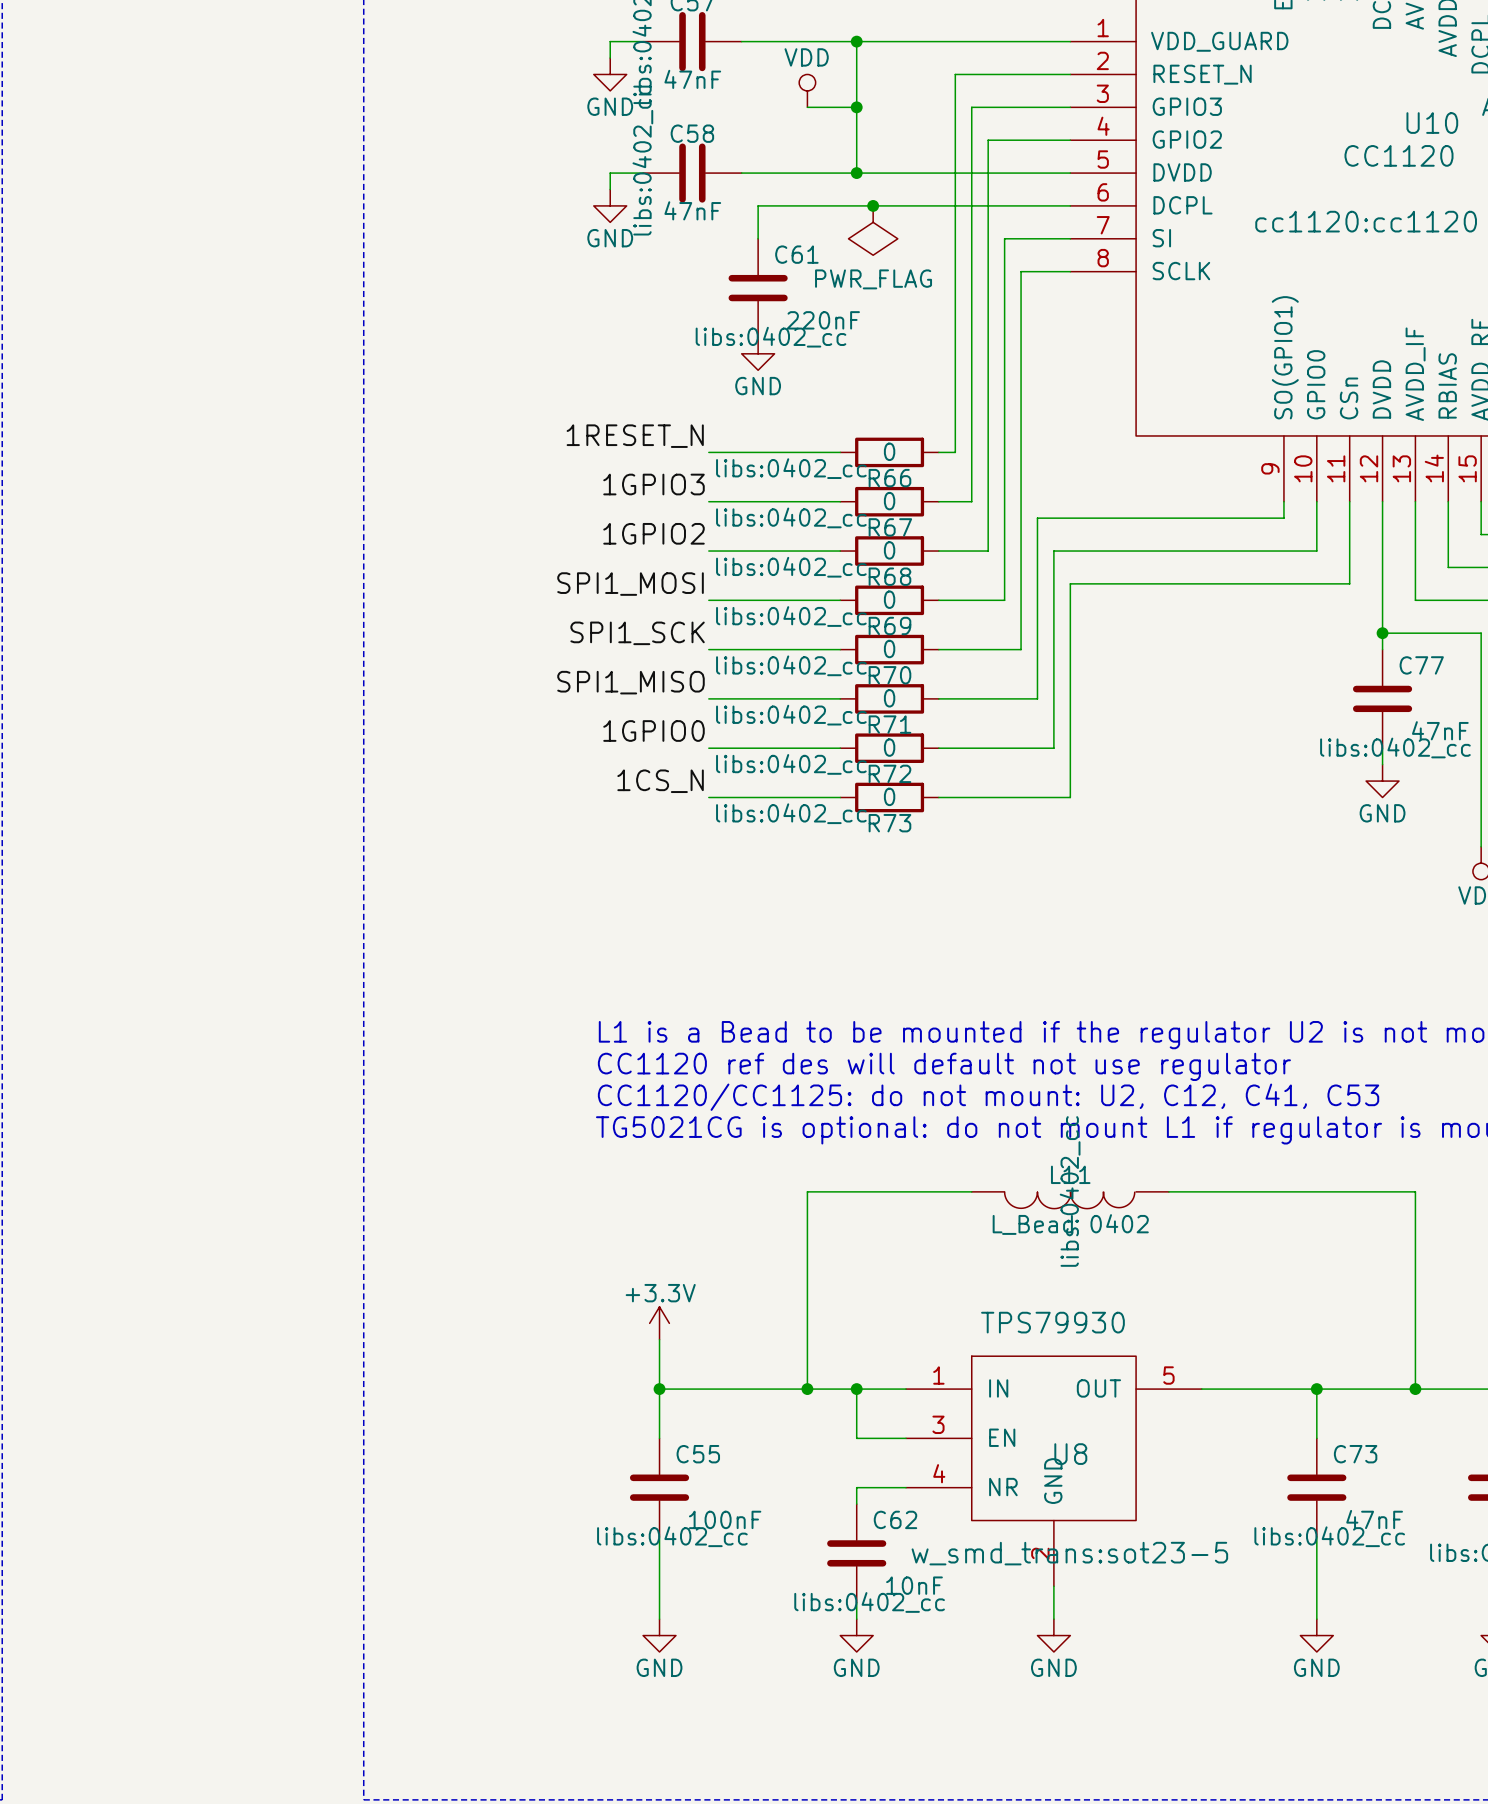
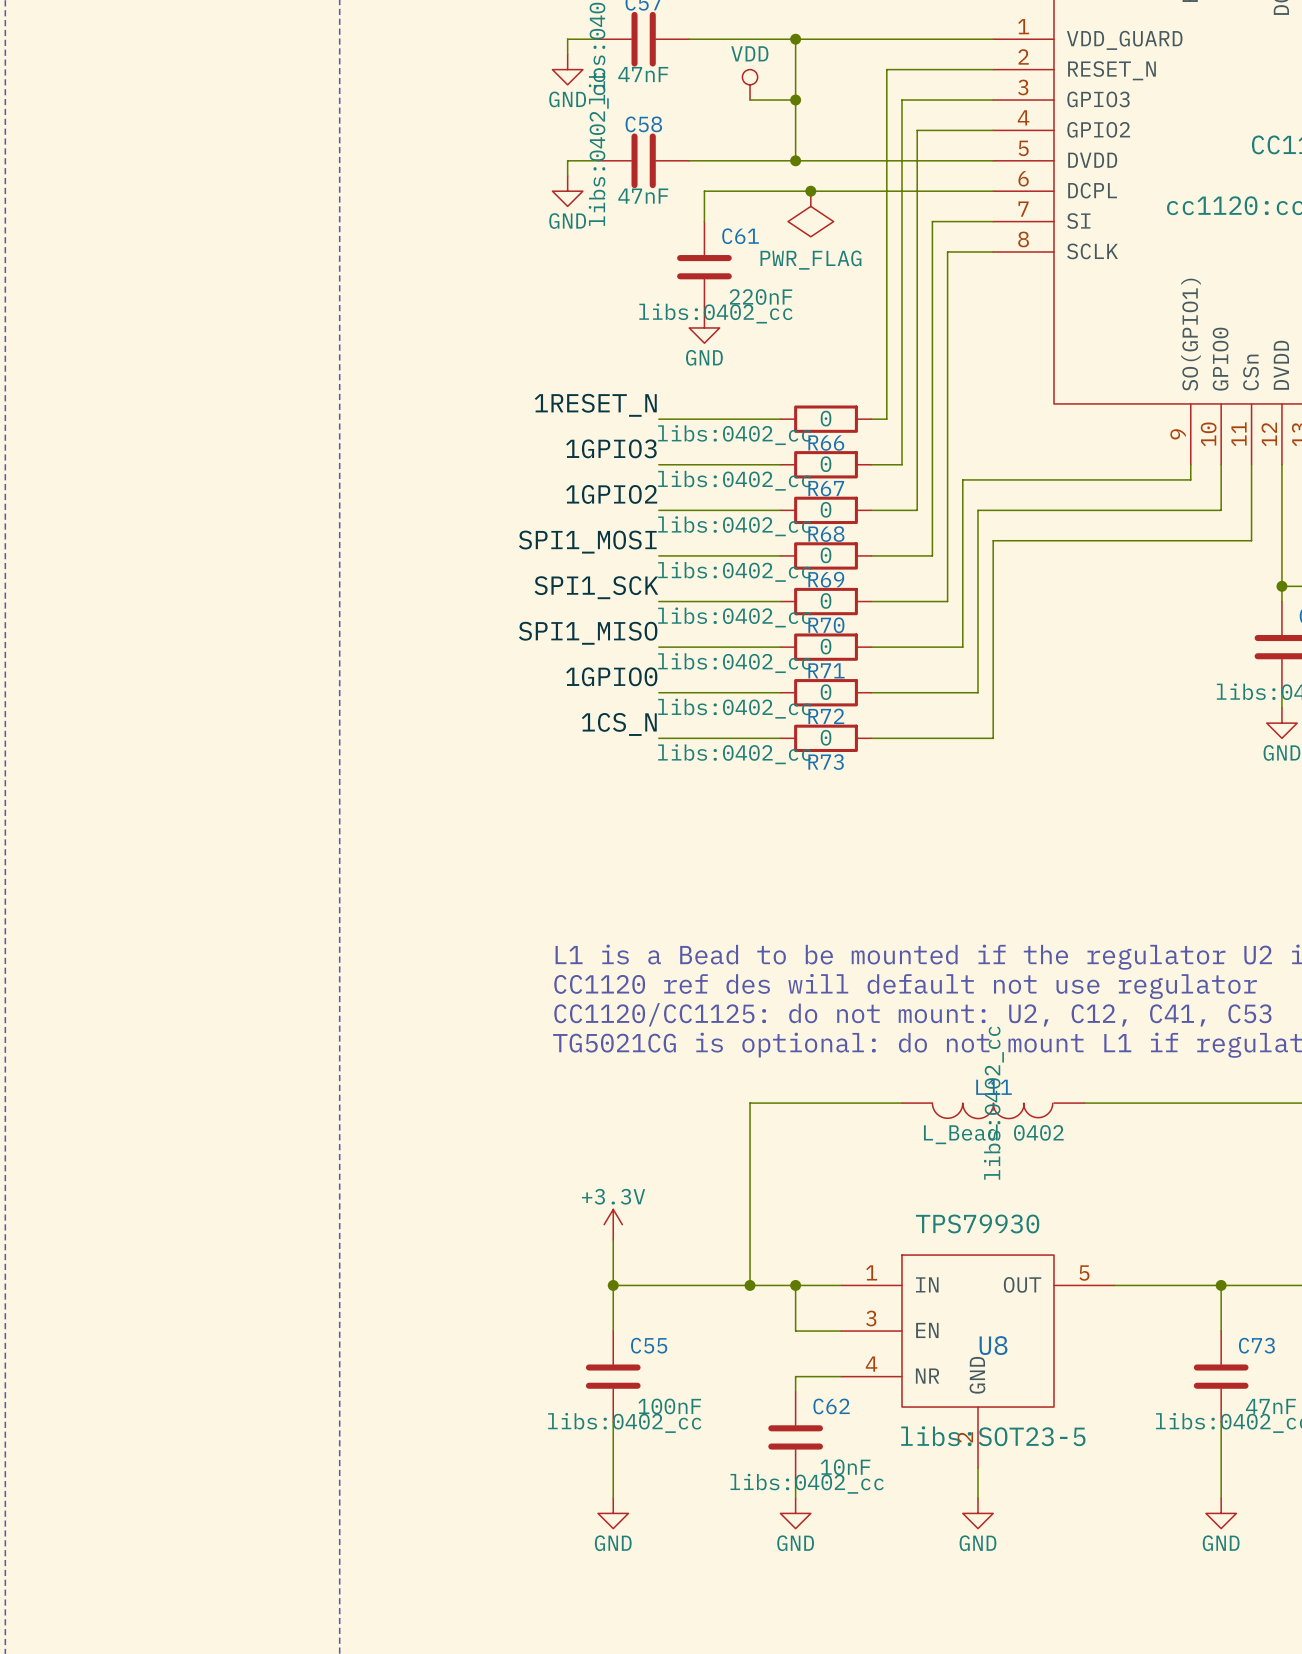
U8 text: w_smd_trans:sot23-5 (1069, 1553) -> libs:SOT23-5 (993, 1436)

